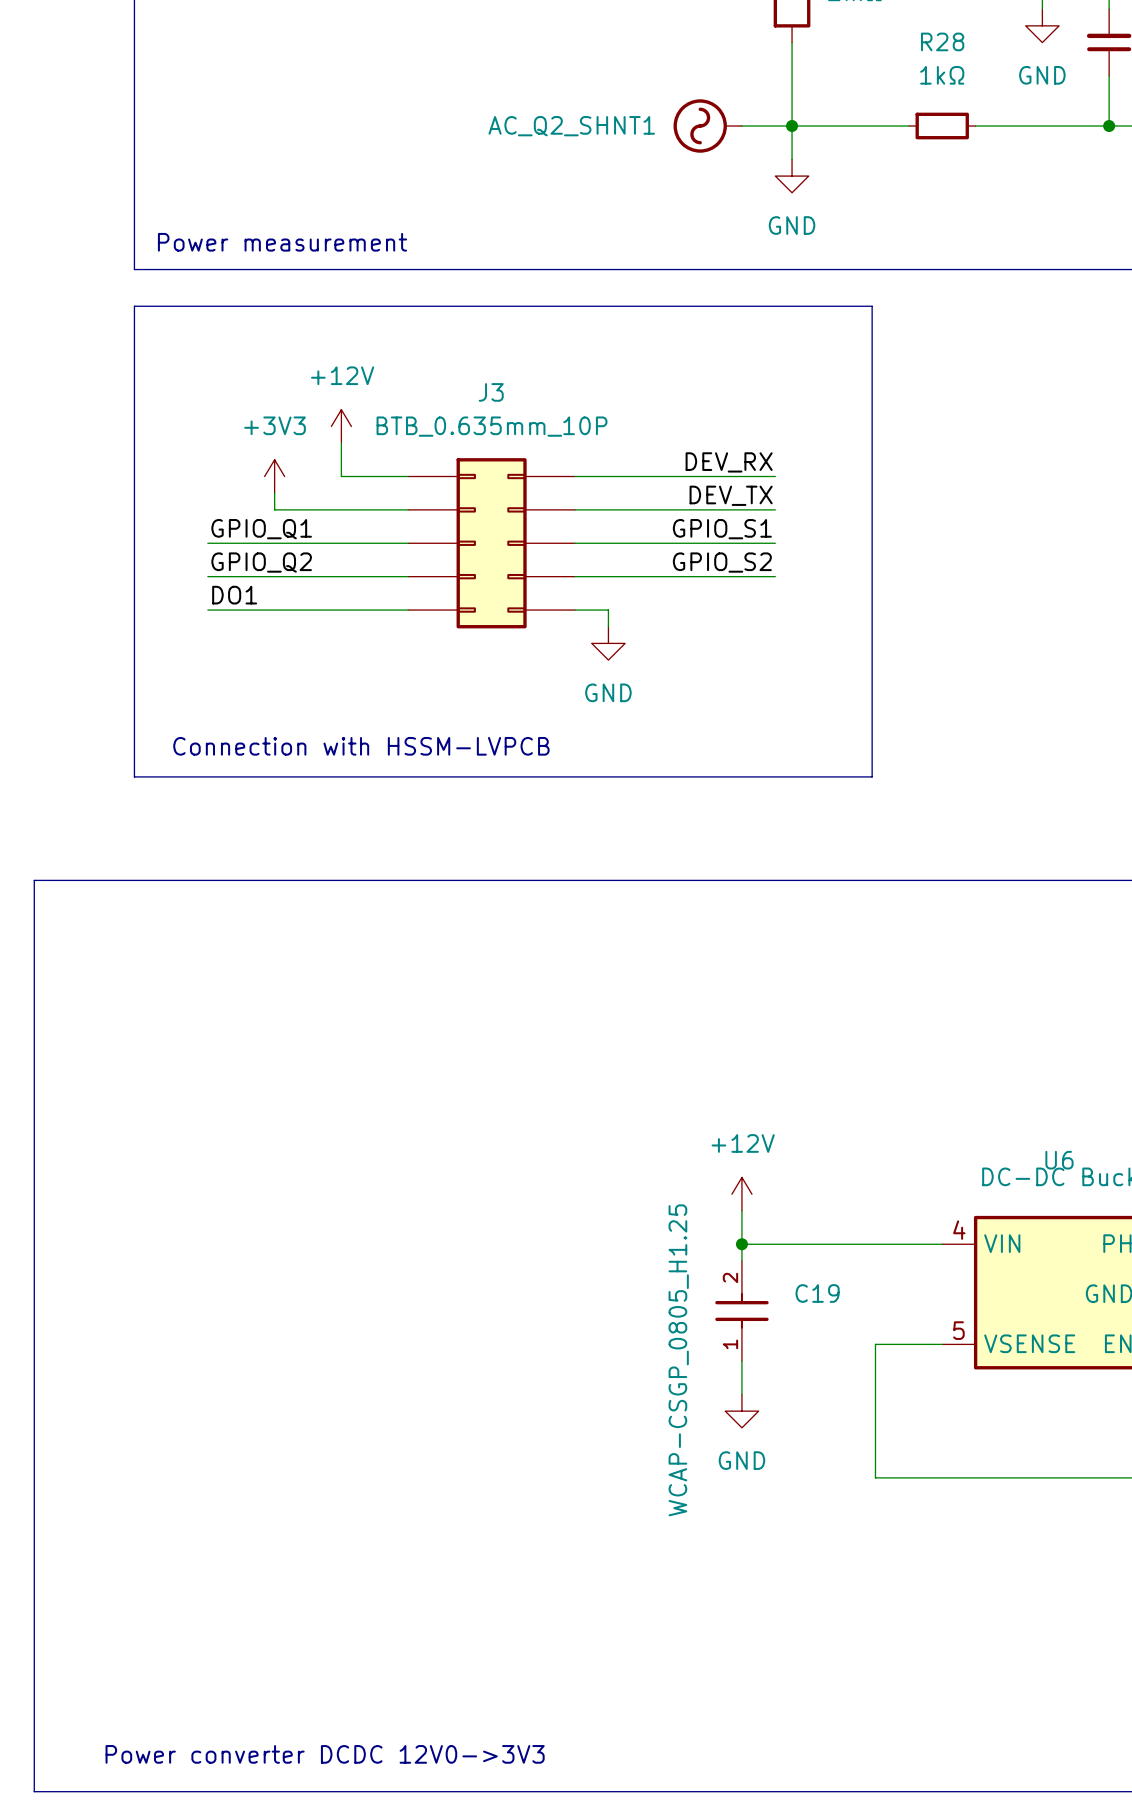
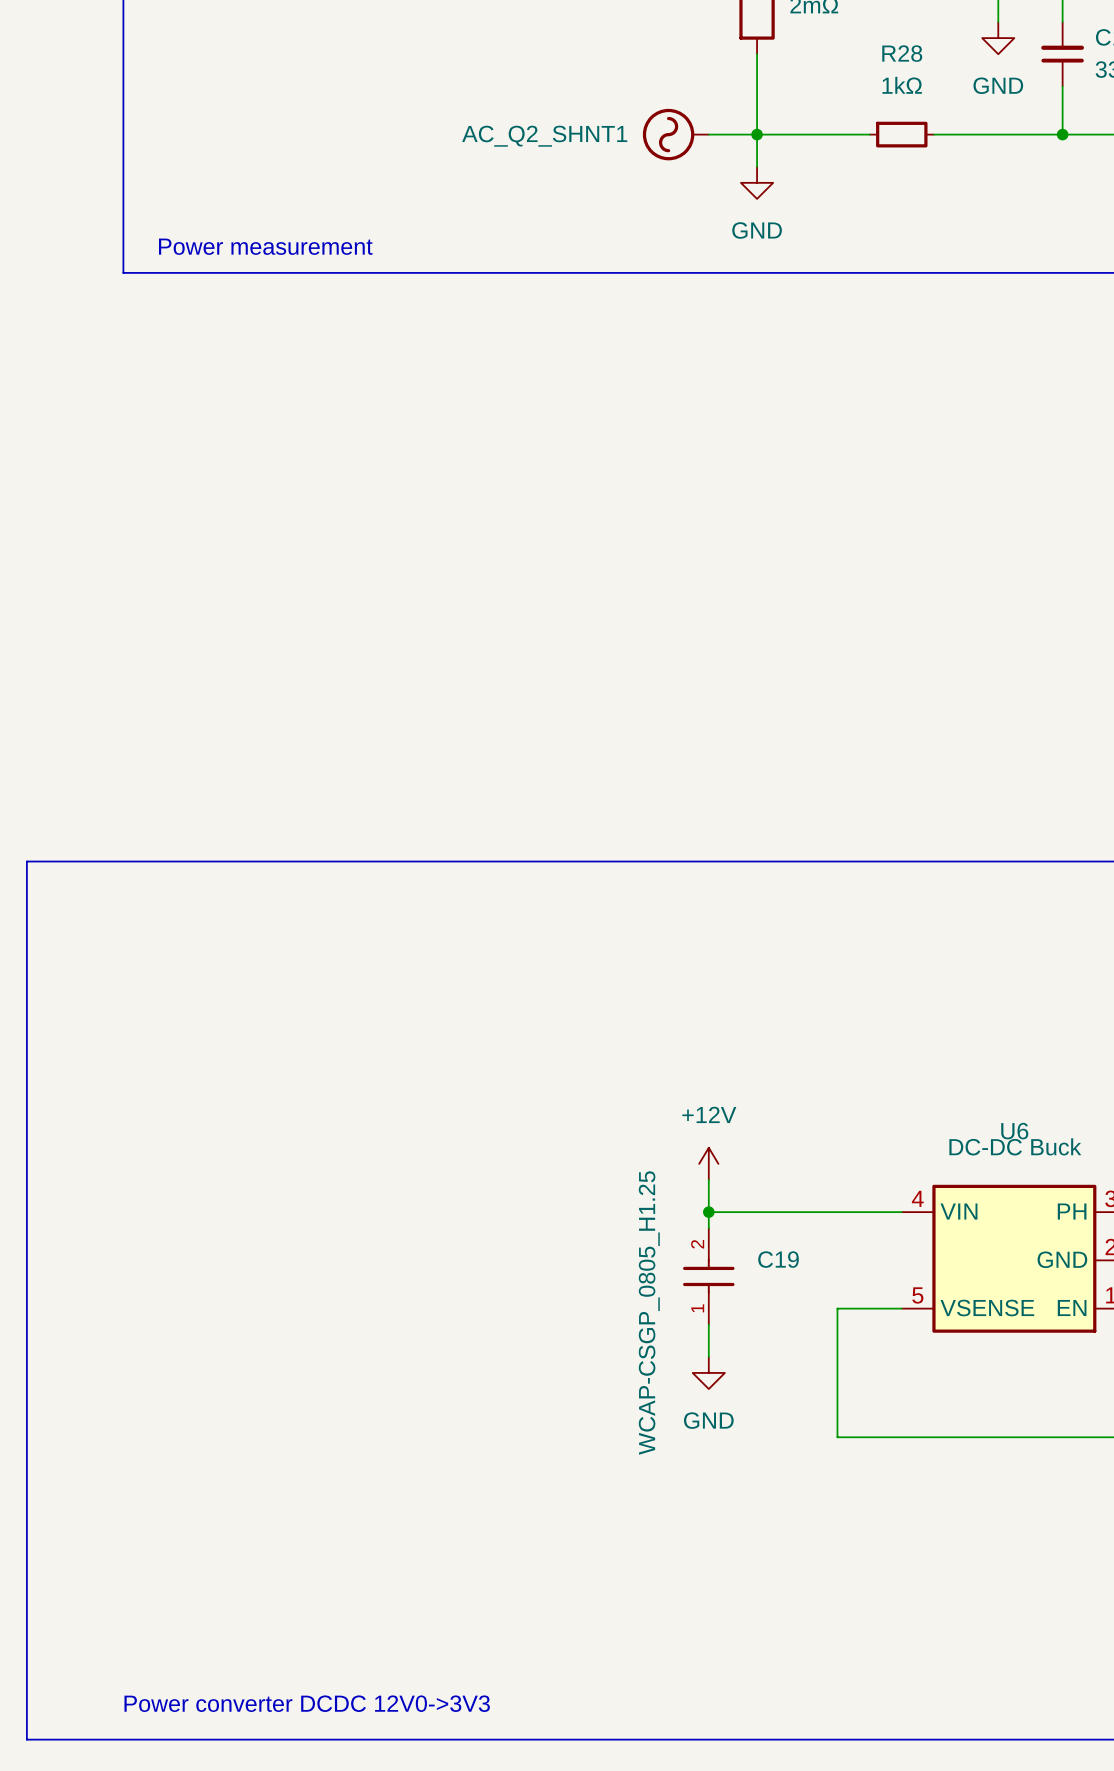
line: (134, 306) (872, 306) (872, 776) (134, 776) (134, 306) -> none
power symbol: +12V (341, 426) -> none
wire: (341, 443) (341, 476) (408, 476) -> none
label: DEV_RX (729, 462) -> none
power symbol: +3V3 (274, 476) -> none
wire: (575, 476) (775, 476) -> none
wire: (274, 493) (274, 509) (408, 509) -> none
label: DEV_TX (731, 495) -> none
wire: (575, 509) (775, 509) -> none
label: GPIO_Q1 (261, 529) -> none
label: GPIO_S1 (722, 529) -> none
wire: (207, 543) (408, 543) -> none
J3: (491, 543) -> none
wire: (575, 543) (775, 543) -> none
label: GPIO_Q2 (261, 562) -> none
label: GPIO_S2 (722, 562) -> none
wire: (207, 576) (408, 576) -> none
wire: (575, 576) (775, 576) -> none
label: DO1 (234, 595) -> none
wire: (207, 610) (408, 610) -> none
wire: (575, 610) (608, 610) (608, 626) -> none
power symbol: GND (608, 643) -> none
text: Connection with HSSM-LVPCB (361, 746) -> none

